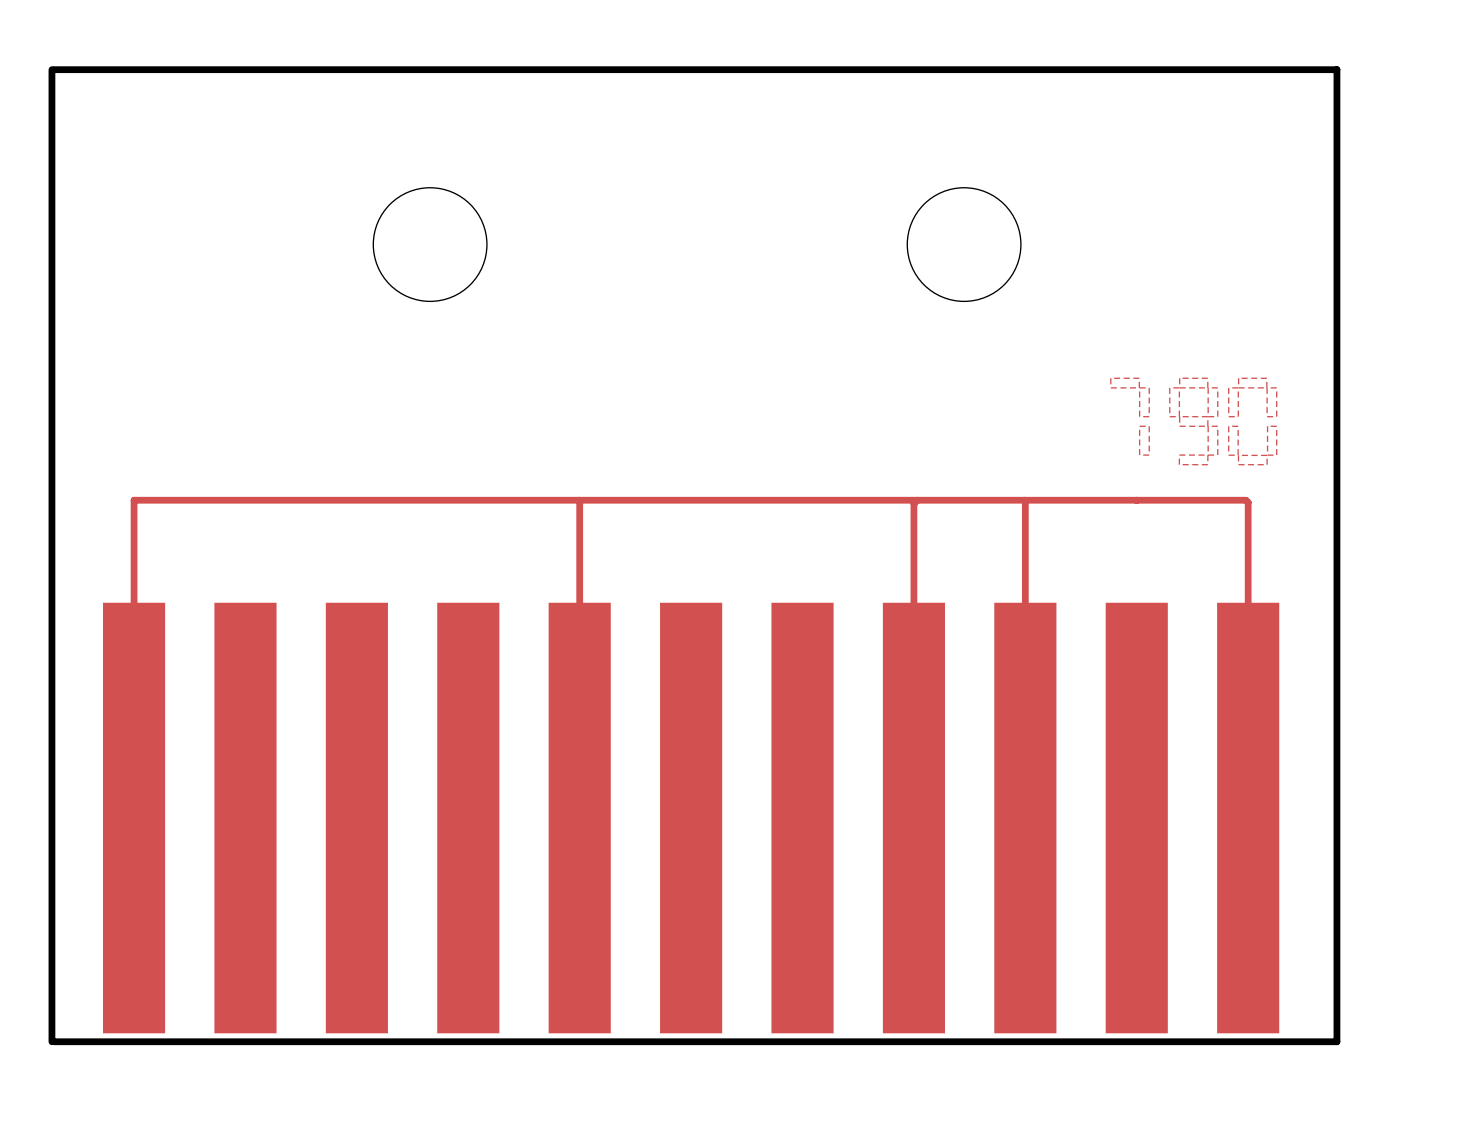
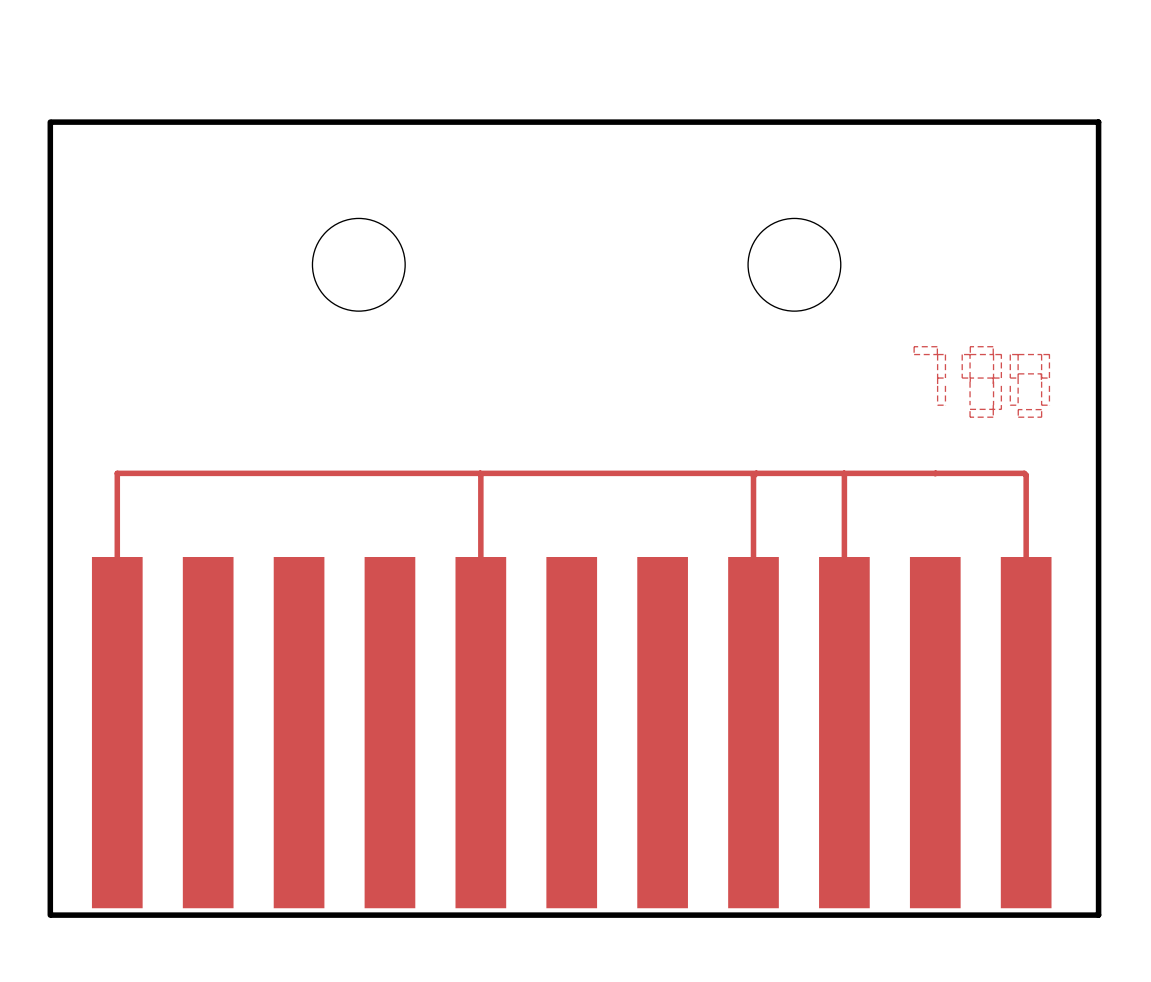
top zone outline: none -> (962, 354) (1001, 354) (1001, 378) (962, 378) (962, 354)
top zone outline: none -> (970, 354) (970, 346) (993, 346) (993, 354)
top zone outline: none -> (1041, 354) (1041, 378) (1049, 378) (1049, 354) (1010, 354) (1010, 378) (1018, 378)
top zone outline: (1139, 378) (1110, 378) (1110, 387) (1149, 387) (1149, 392) -> (937, 373) (937, 346) (914, 346) (914, 354) (945, 354) (945, 378) (937, 378)
top zone outline: (1179, 383) (1179, 378) (1207, 378) (1207, 383) -> (993, 354) (993, 378)
top zone outline: (1217, 392) (1217, 387) (1169, 387) (1169, 416) (1217, 416) -> (993, 413) (993, 417) (970, 417) (970, 409) (1001, 409) (1001, 405)
top zone outline: (1228, 392) (1228, 387) (1276, 387) (1276, 392) -> none
top zone outline: (1179, 416) (1179, 426) (1217, 426) (1217, 455) (1179, 455) (1179, 464) (1207, 464) (1207, 455) -> none
top zone outline: (1139, 426) (1139, 455) (1149, 455) (1149, 426) (1139, 426) -> none
top zone outline: (1208, 426) (1208, 455) -> (970, 354) (970, 378)
top zone outline: (1228, 426) (1238, 426) (1238, 455) (1228, 455) (1228, 426) -> none
top zone outline: (1267, 426) (1276, 426) (1276, 455) (1267, 455) (1267, 426) -> none
top zone outline: (1238, 455) (1238, 464) (1267, 464) (1267, 455) (1238, 455) -> (1018, 409) (1018, 417) (1041, 417) (1041, 409) (1018, 409)

